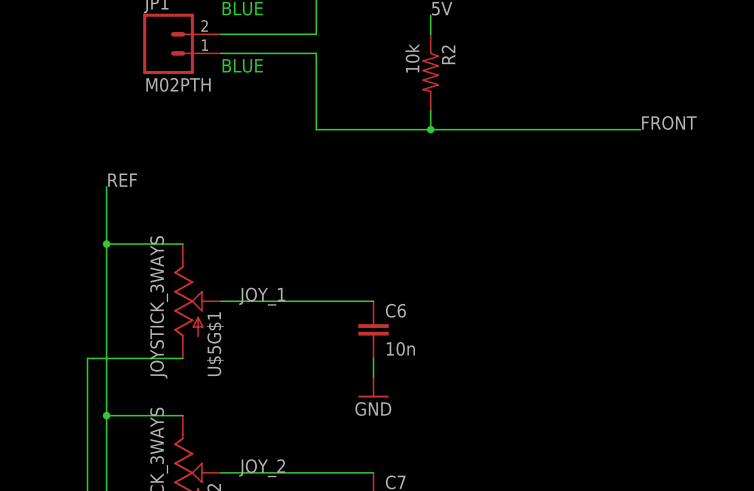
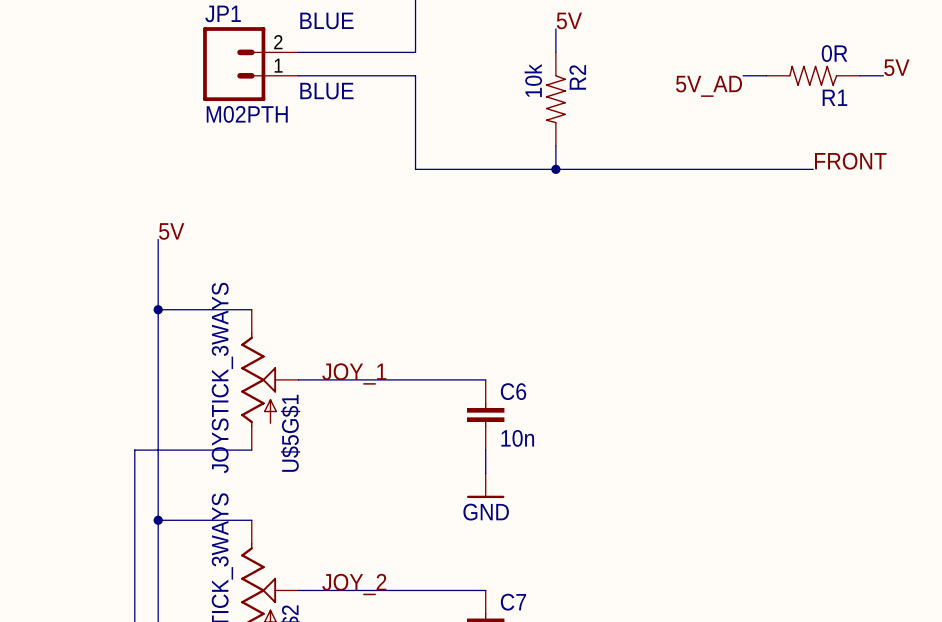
label: none -> 5V (896, 67)
wire: none -> (743, 75) (766, 75)
R1: none -> 0R (813, 75)
wire: none -> (860, 75) (883, 75)
label: none -> 5V_AD (709, 86)
label: REF (122, 180) -> 5V (171, 231)

